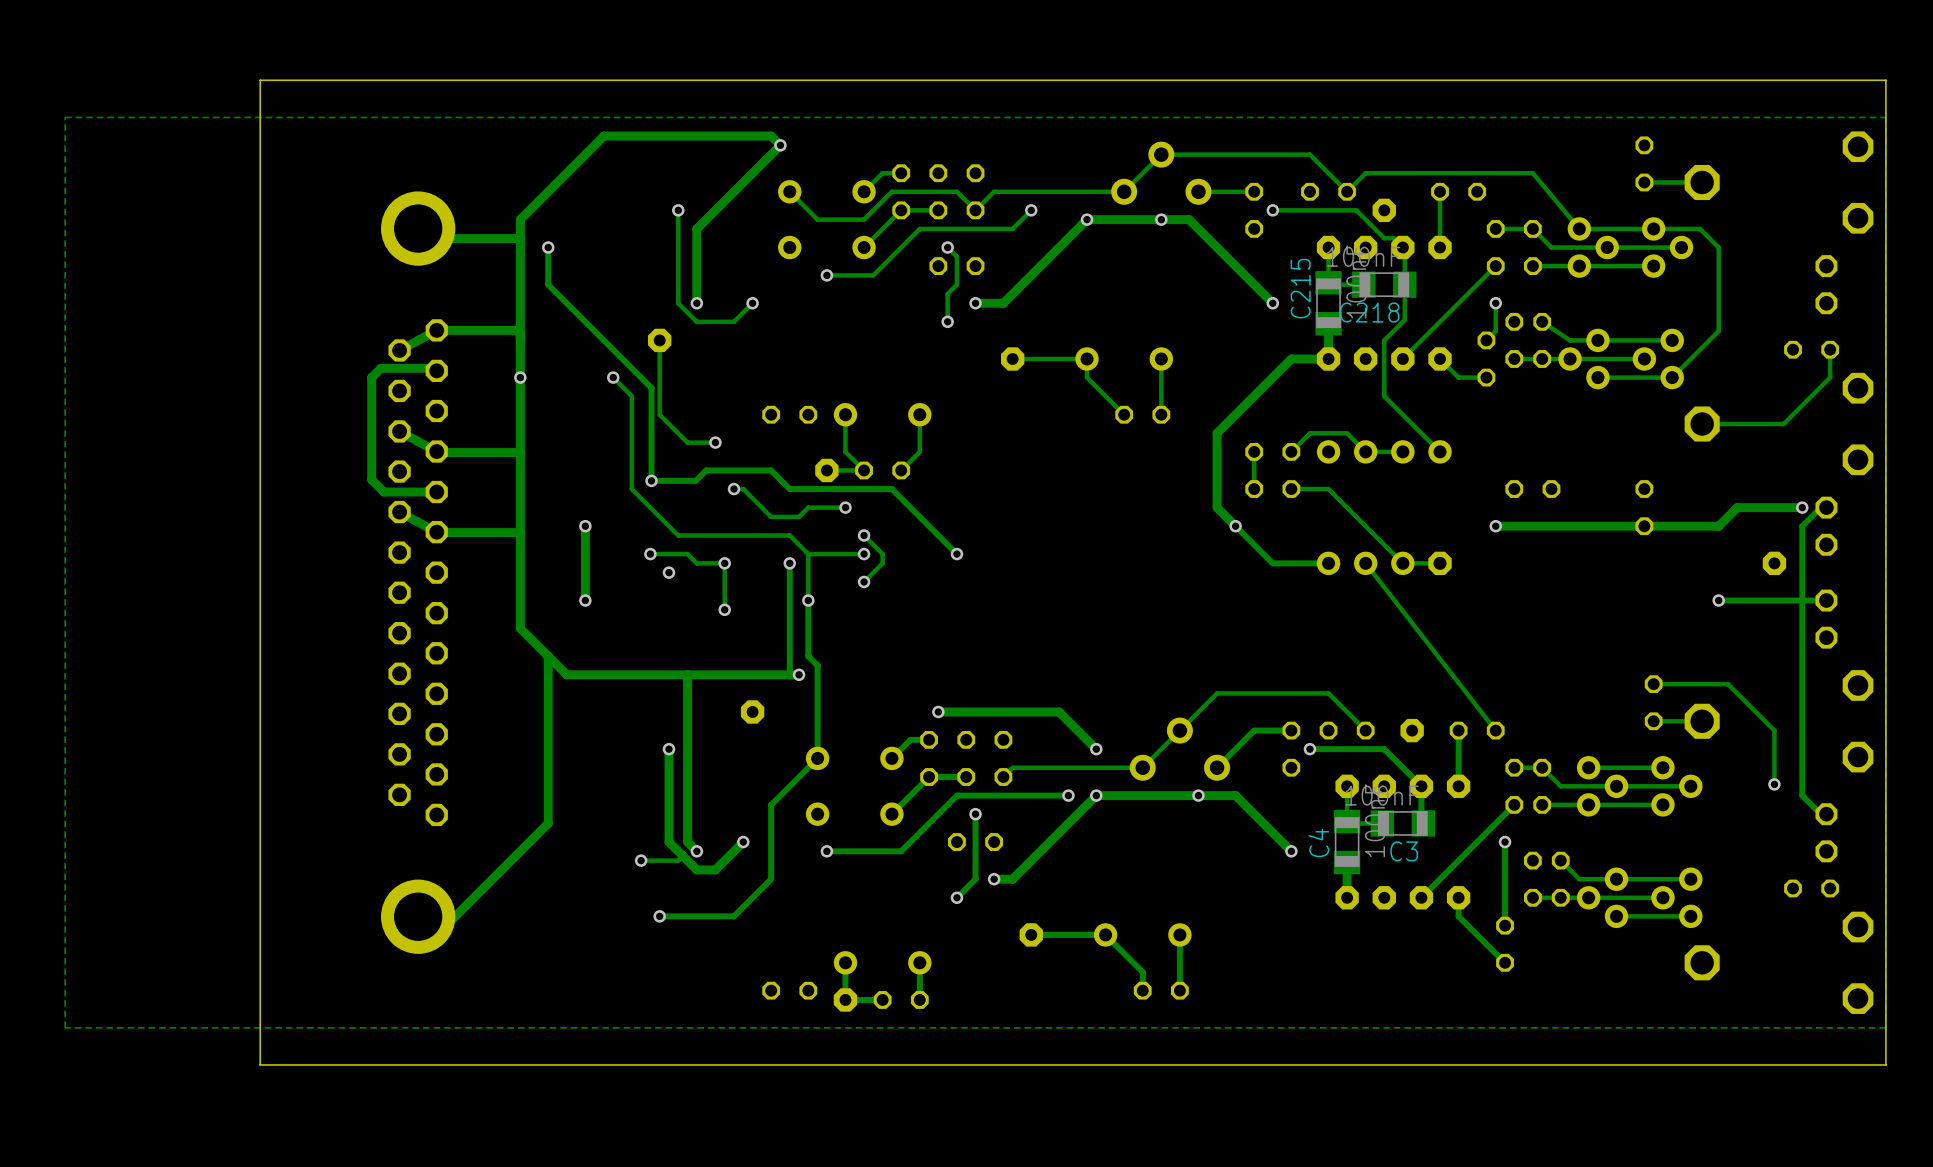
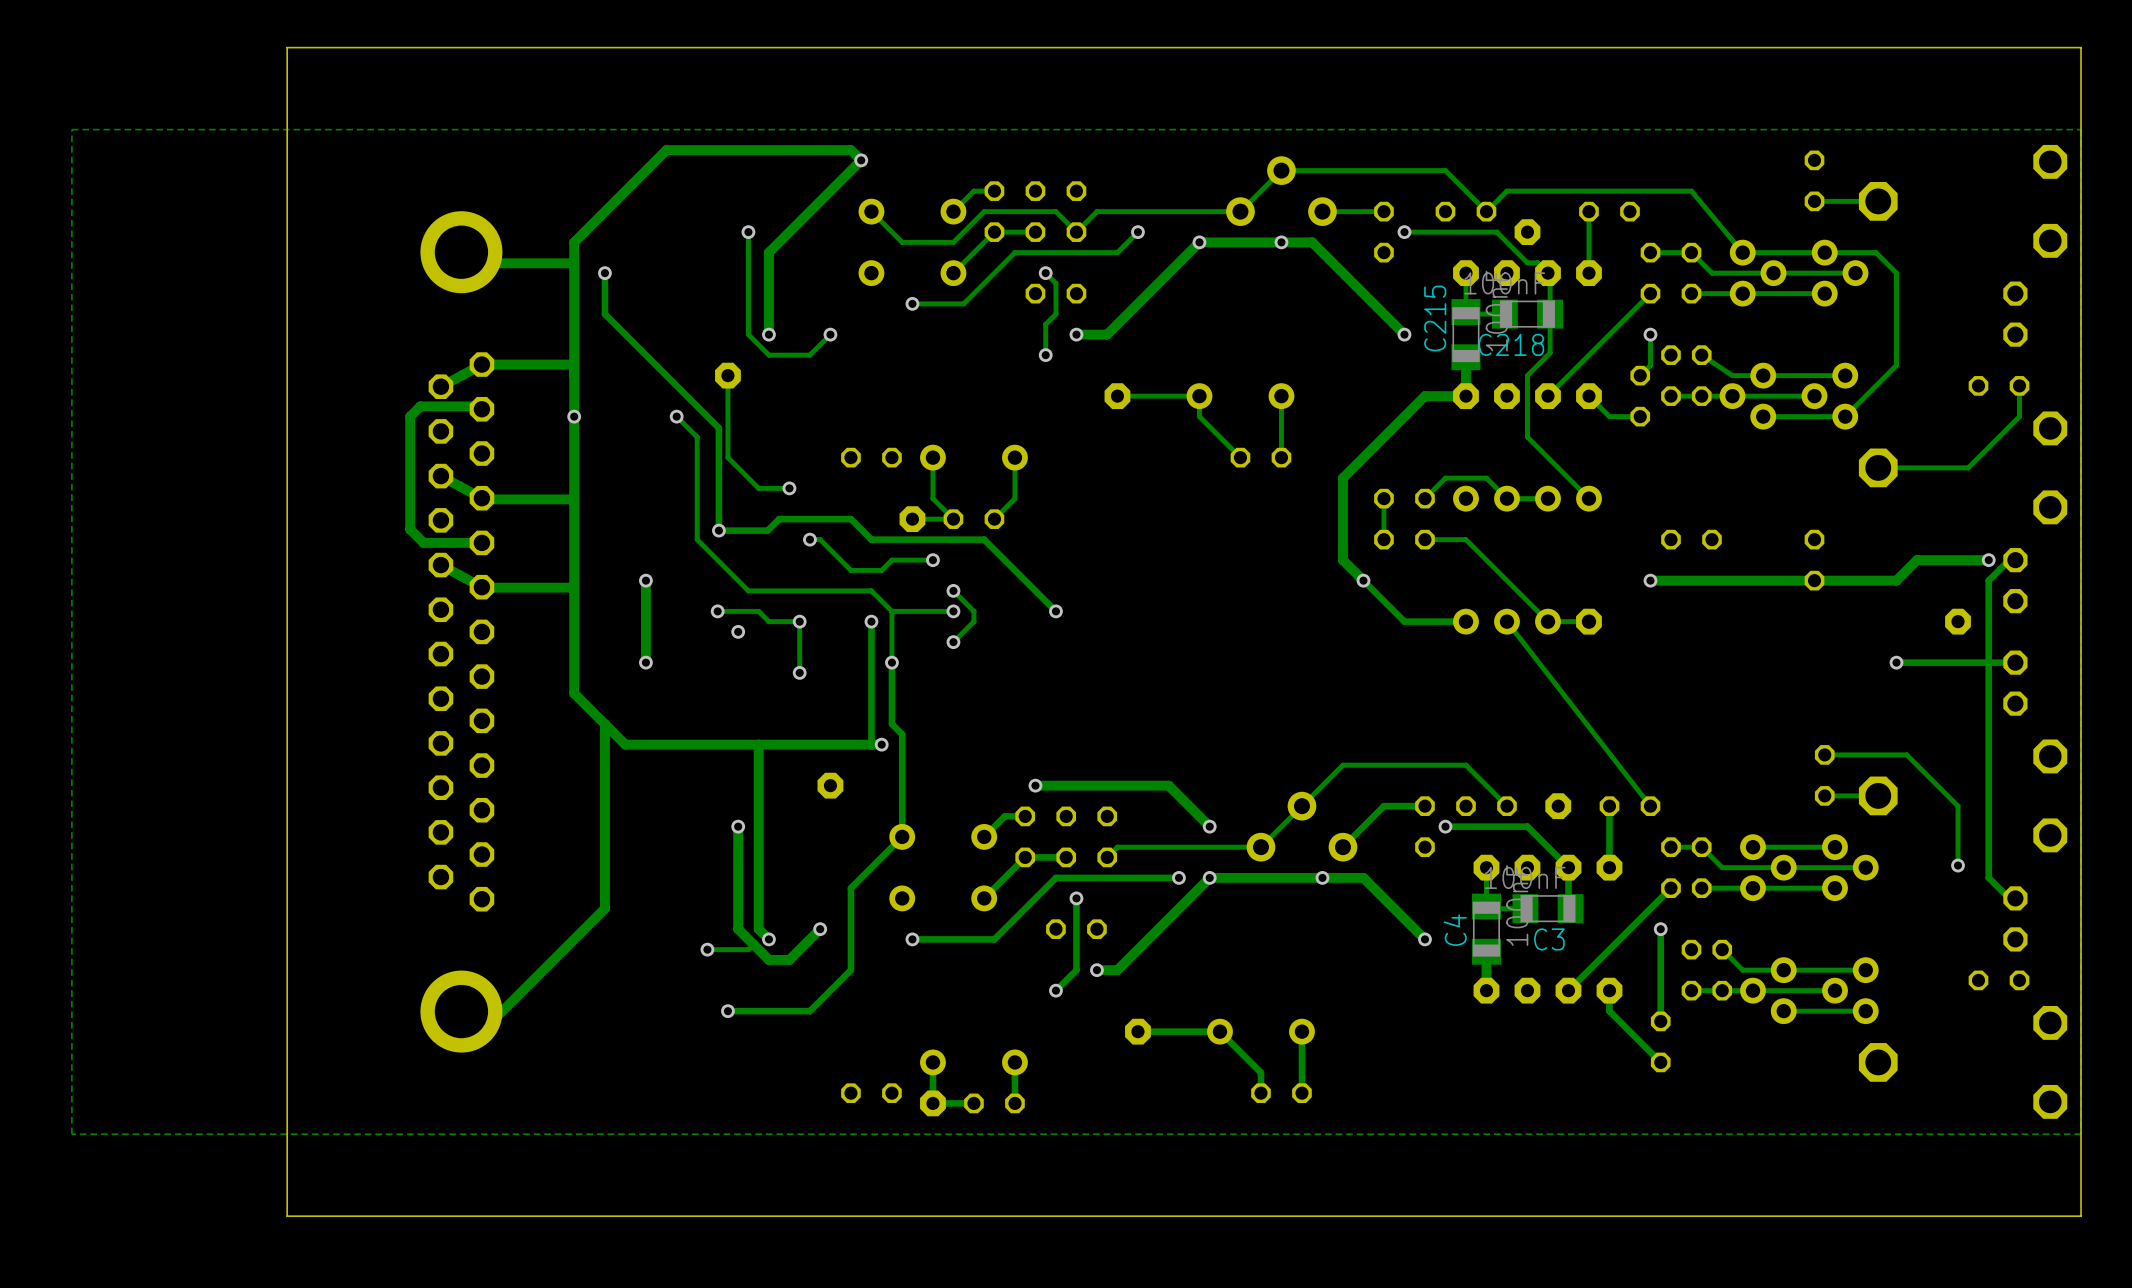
board edge: (1885, 80) (260, 80) -> (2081, 88) (2081, 47) (287, 47) (287, 88)
board edge: (1885, 1064) (260, 1064) -> (2081, 1175) (2081, 1216) (287, 1216) (287, 1175)

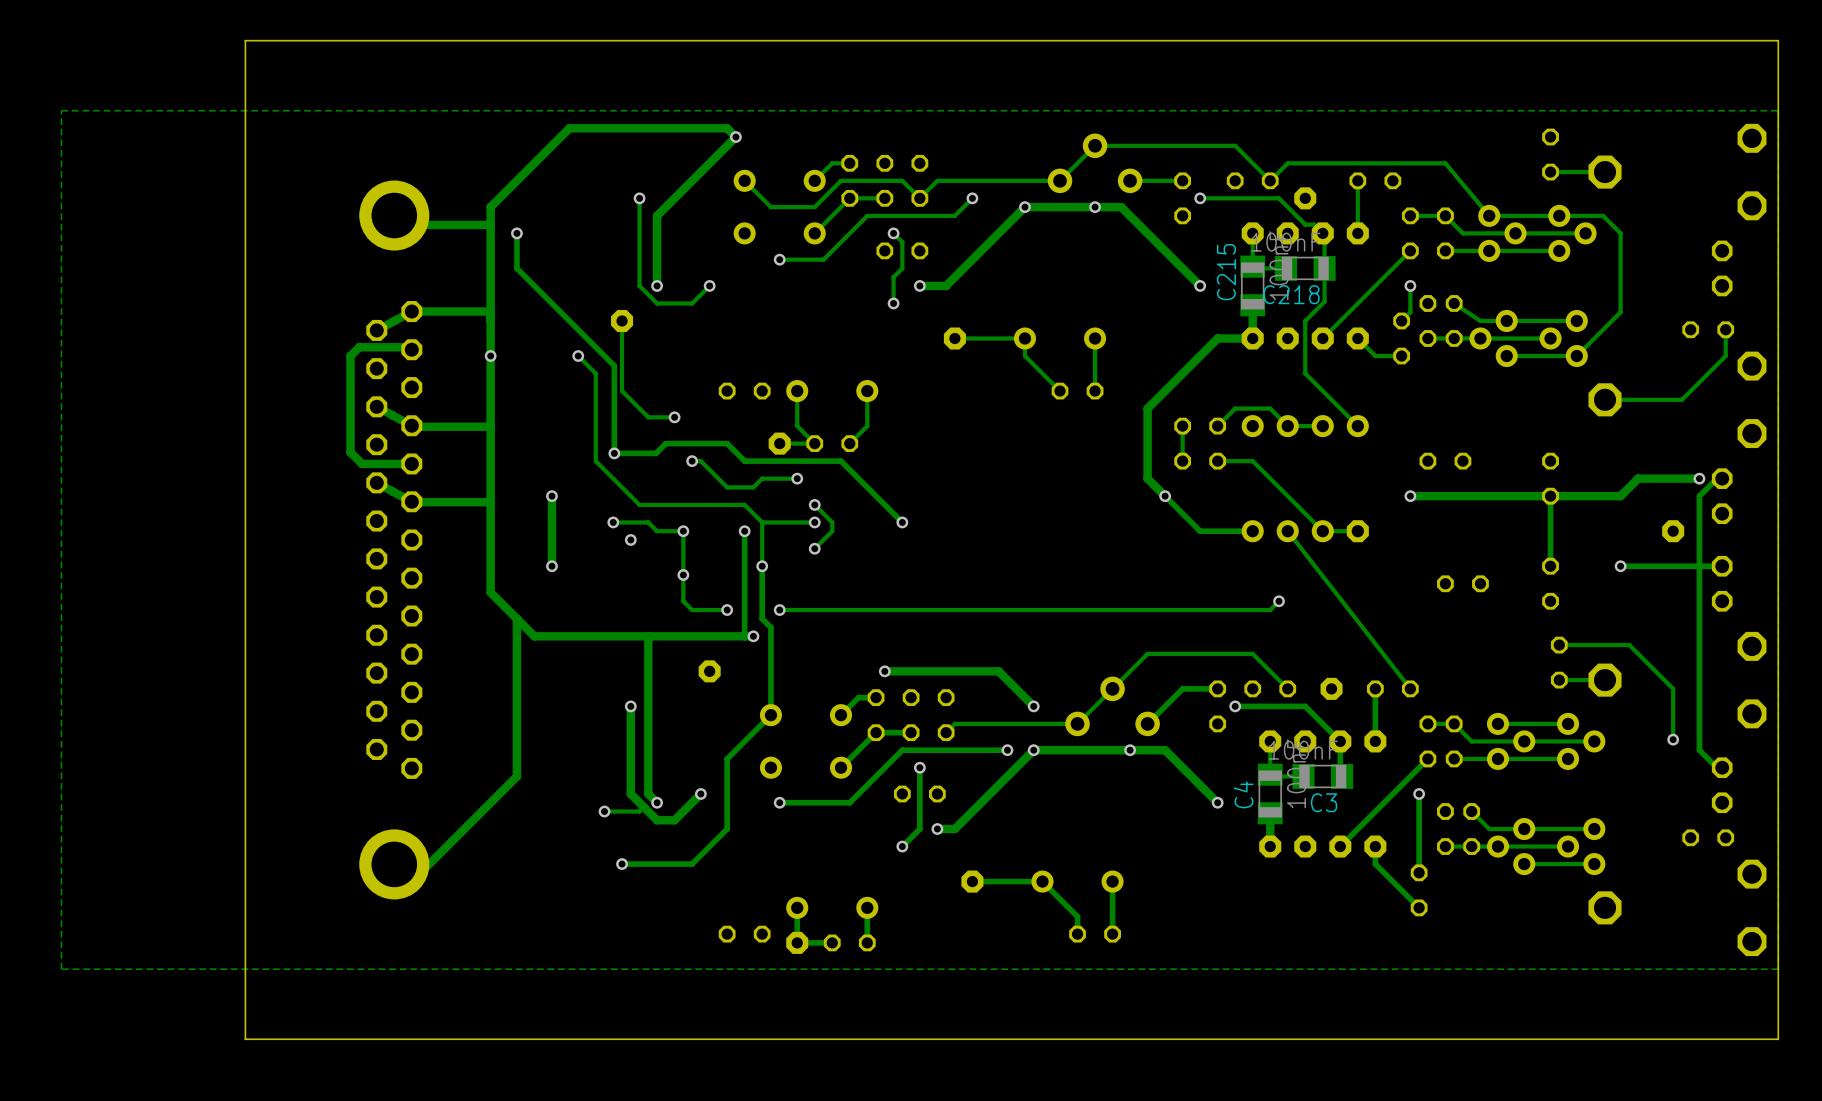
track: none -> (1550, 496) (1550, 566)
track: none -> (683, 575) (683, 601) (692, 610) (727, 610)
part: none -> (1462, 583)
part: none -> (1550, 583)
track: none -> (1279, 601) (1270, 610) (779, 610)
via: none -> (1279, 601)
via: none -> (727, 610)
via: none -> (779, 610)

